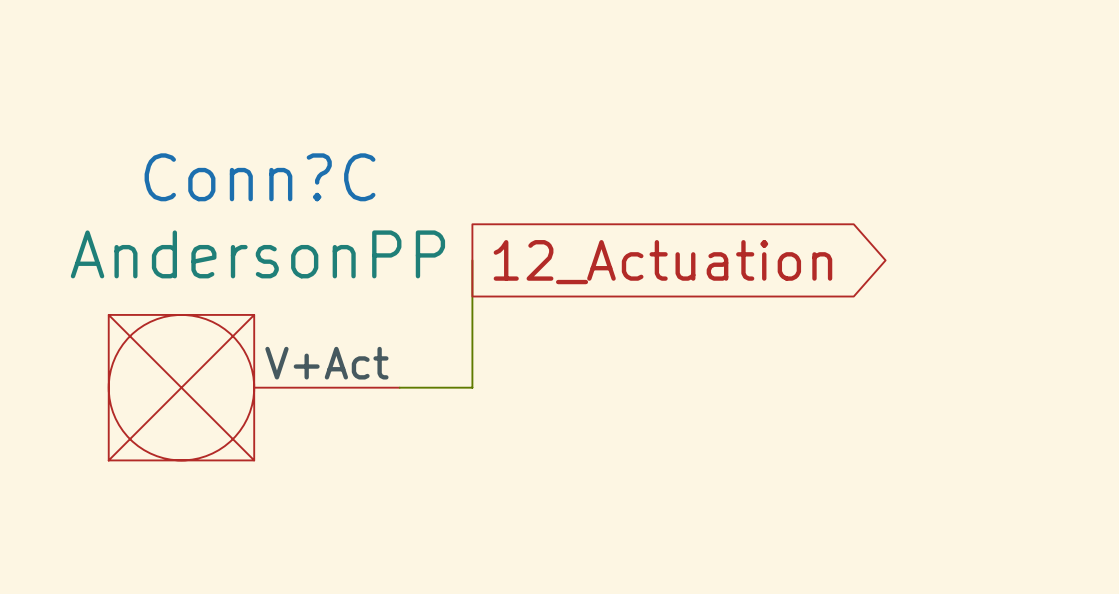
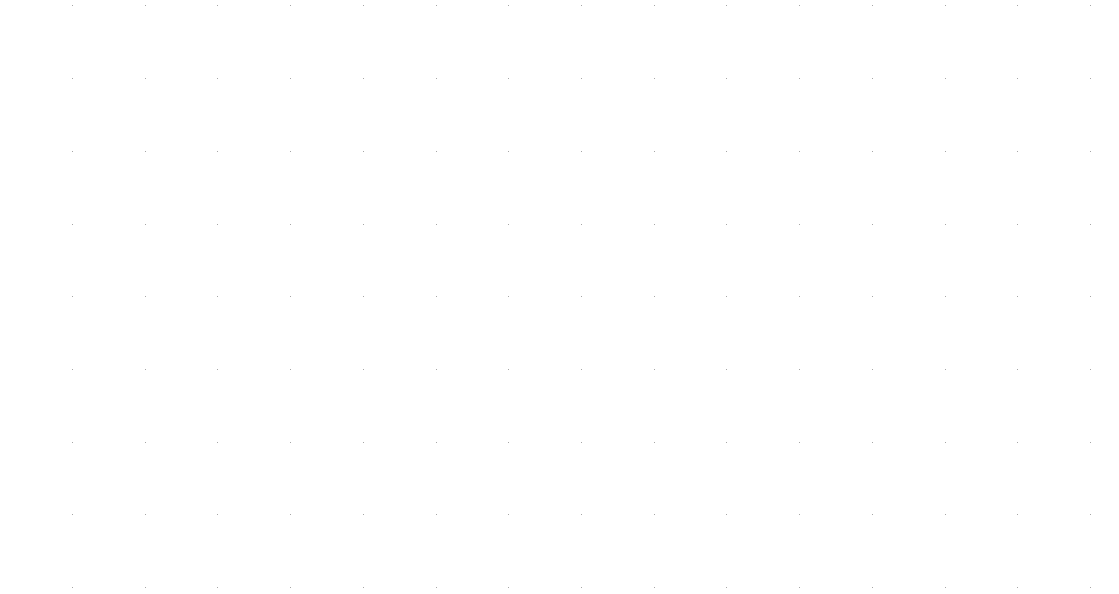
wire: (472, 260) (472, 387) (399, 387) -> none
global label: 12_Actuation (662, 262) -> none
Conn?C: AndersonPP (254, 387) -> none

